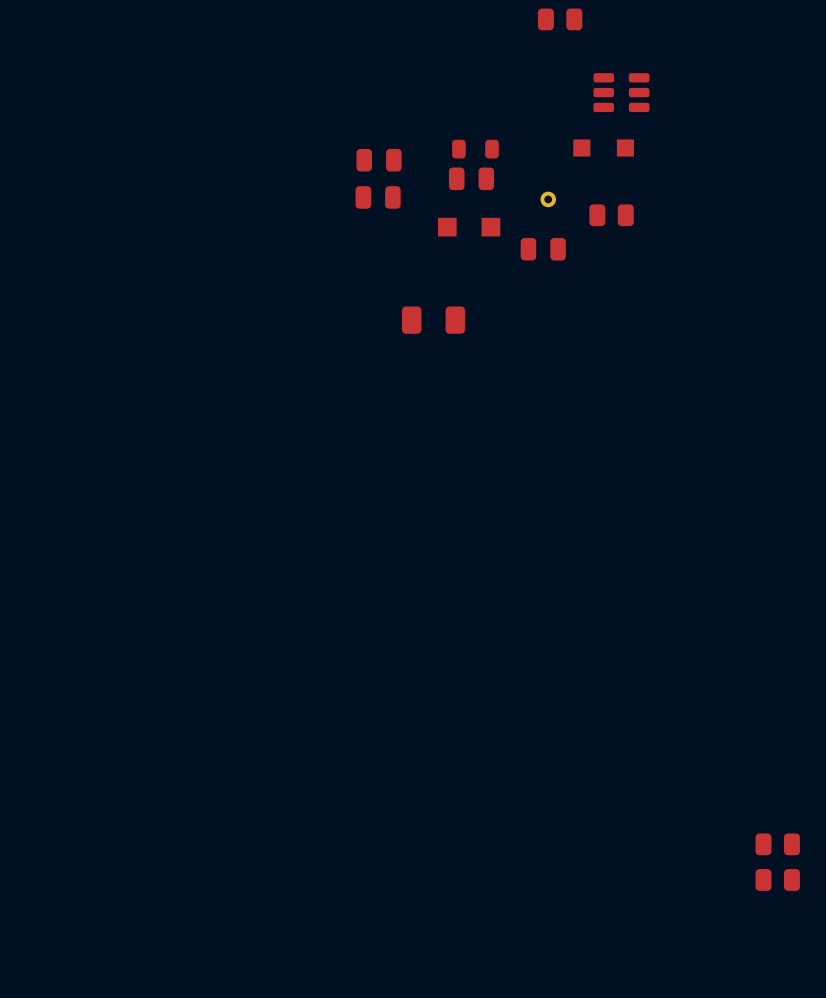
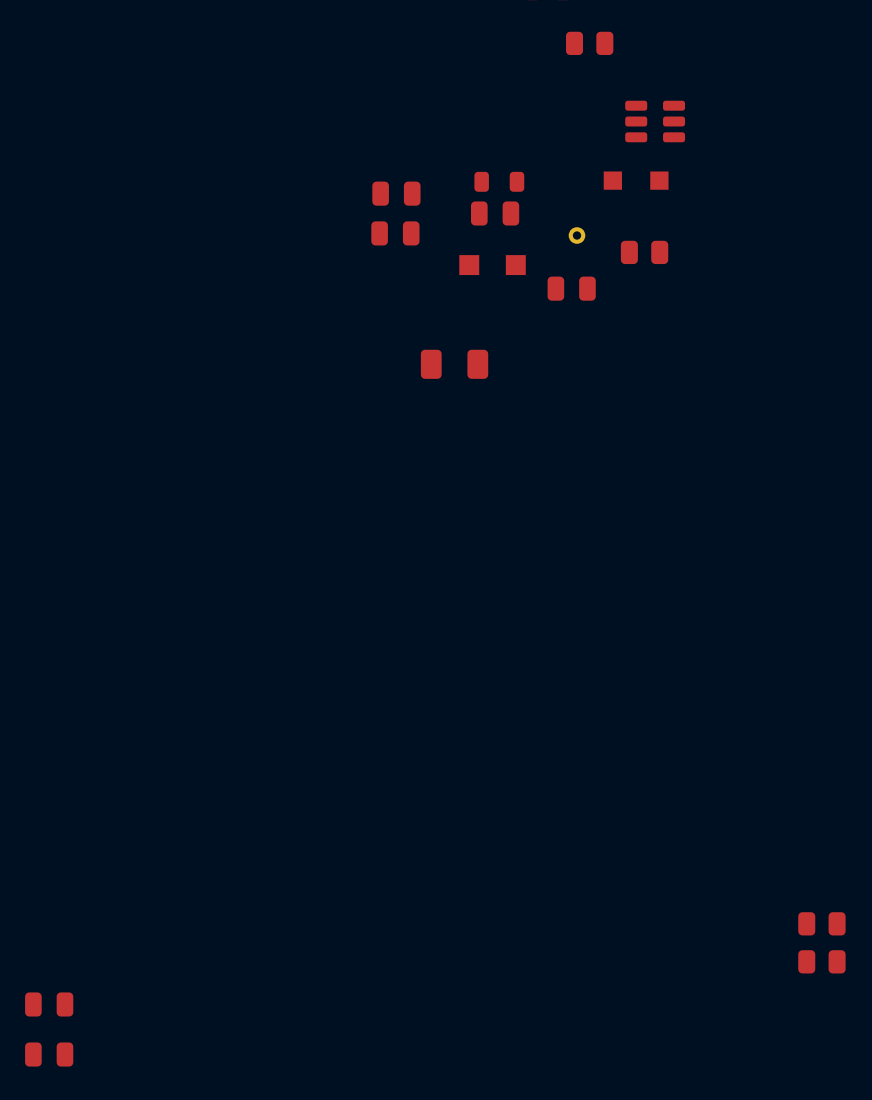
part: none -> (49, 1004)
part: none -> (49, 1054)

